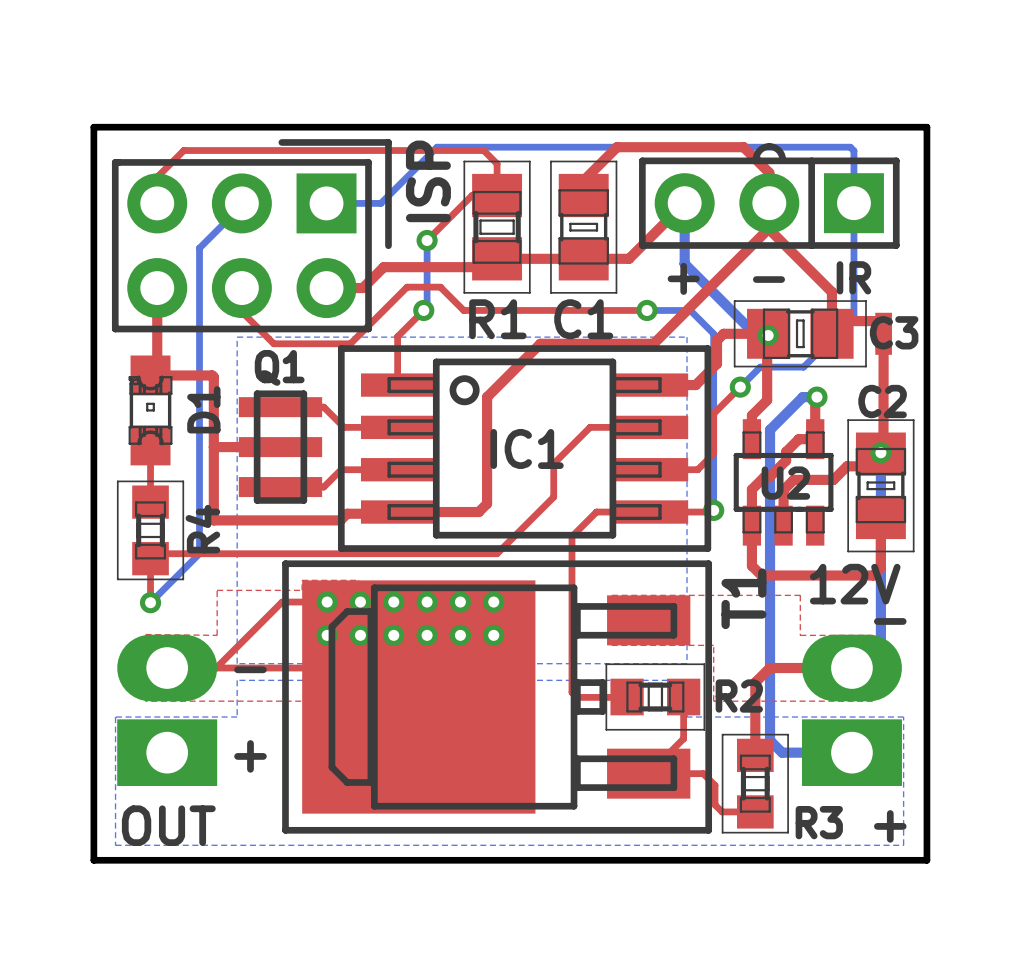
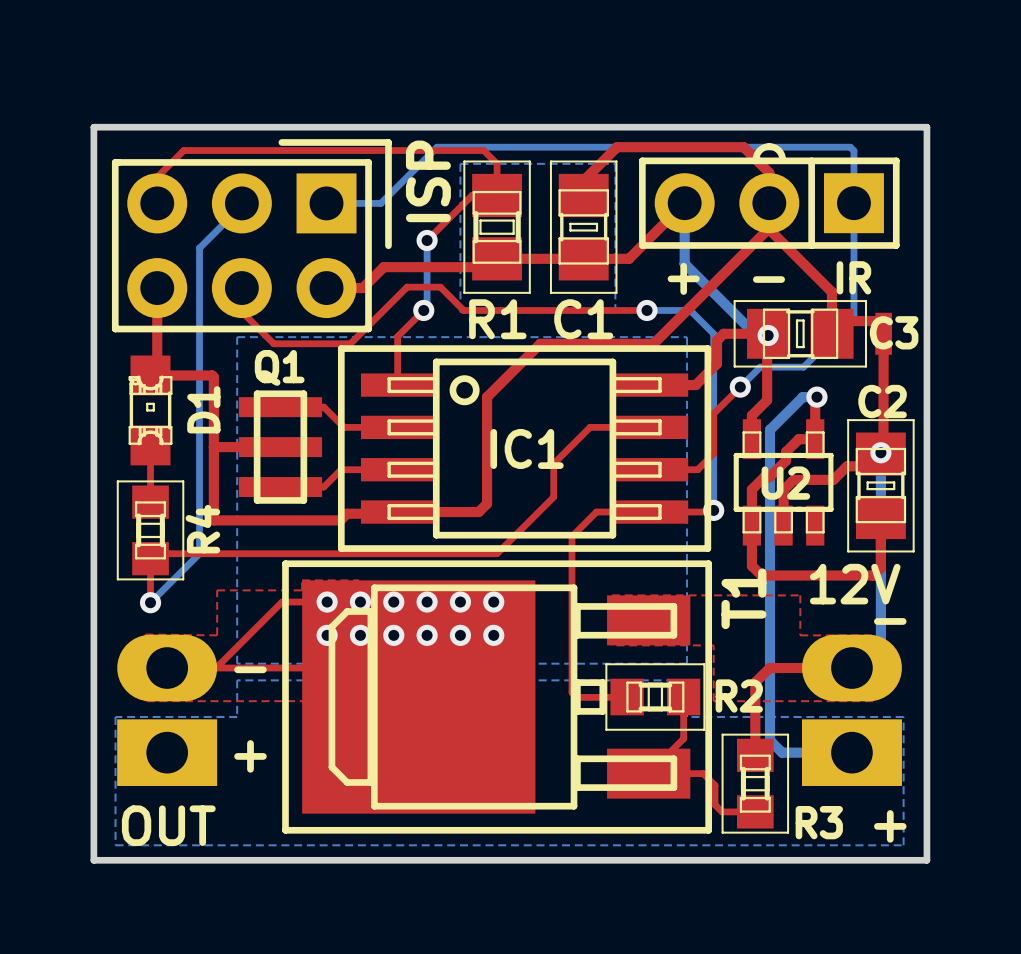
bottom zone outline: none -> (460, 163) (615, 163) (615, 312) (460, 312) (460, 163)

